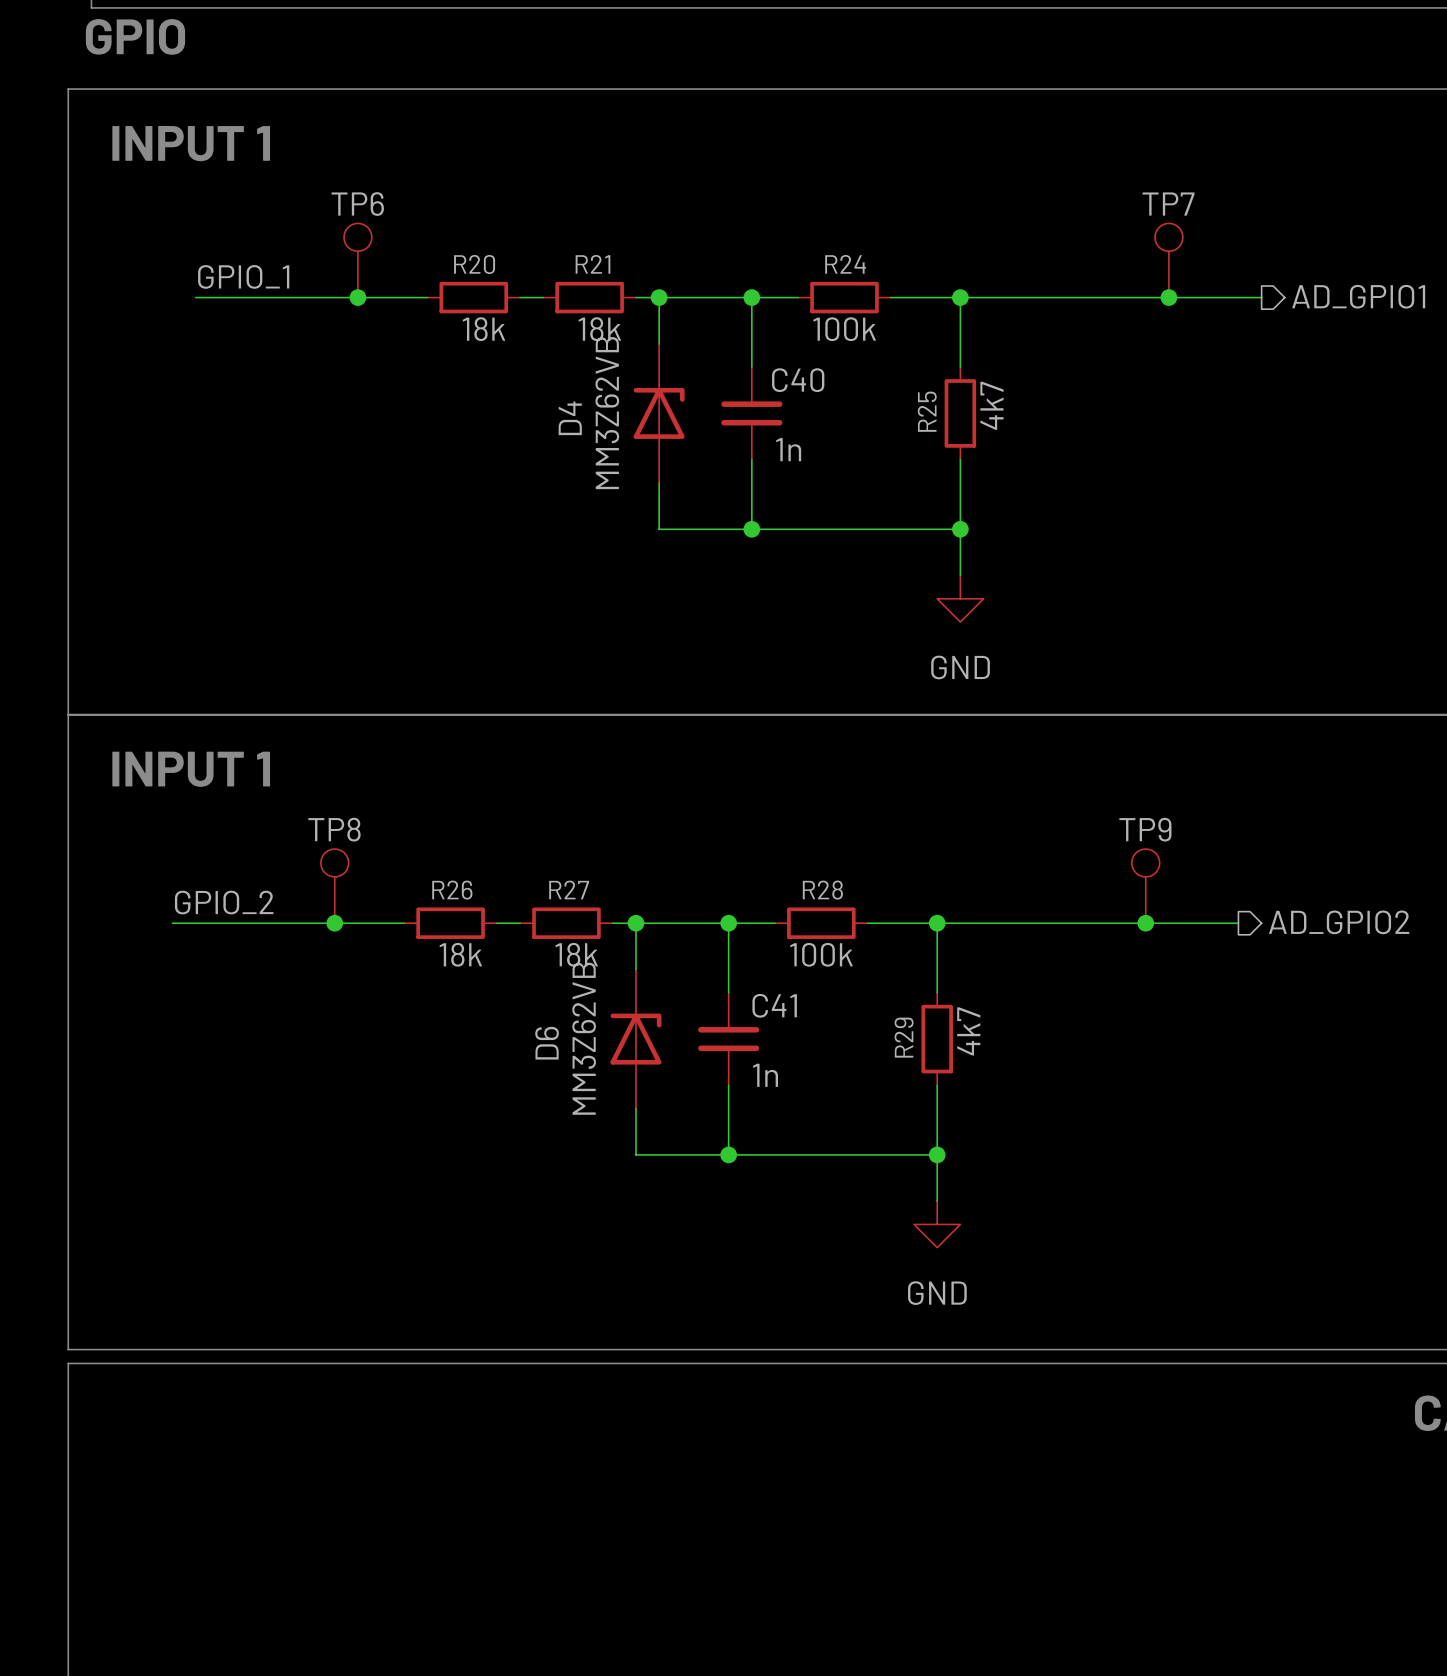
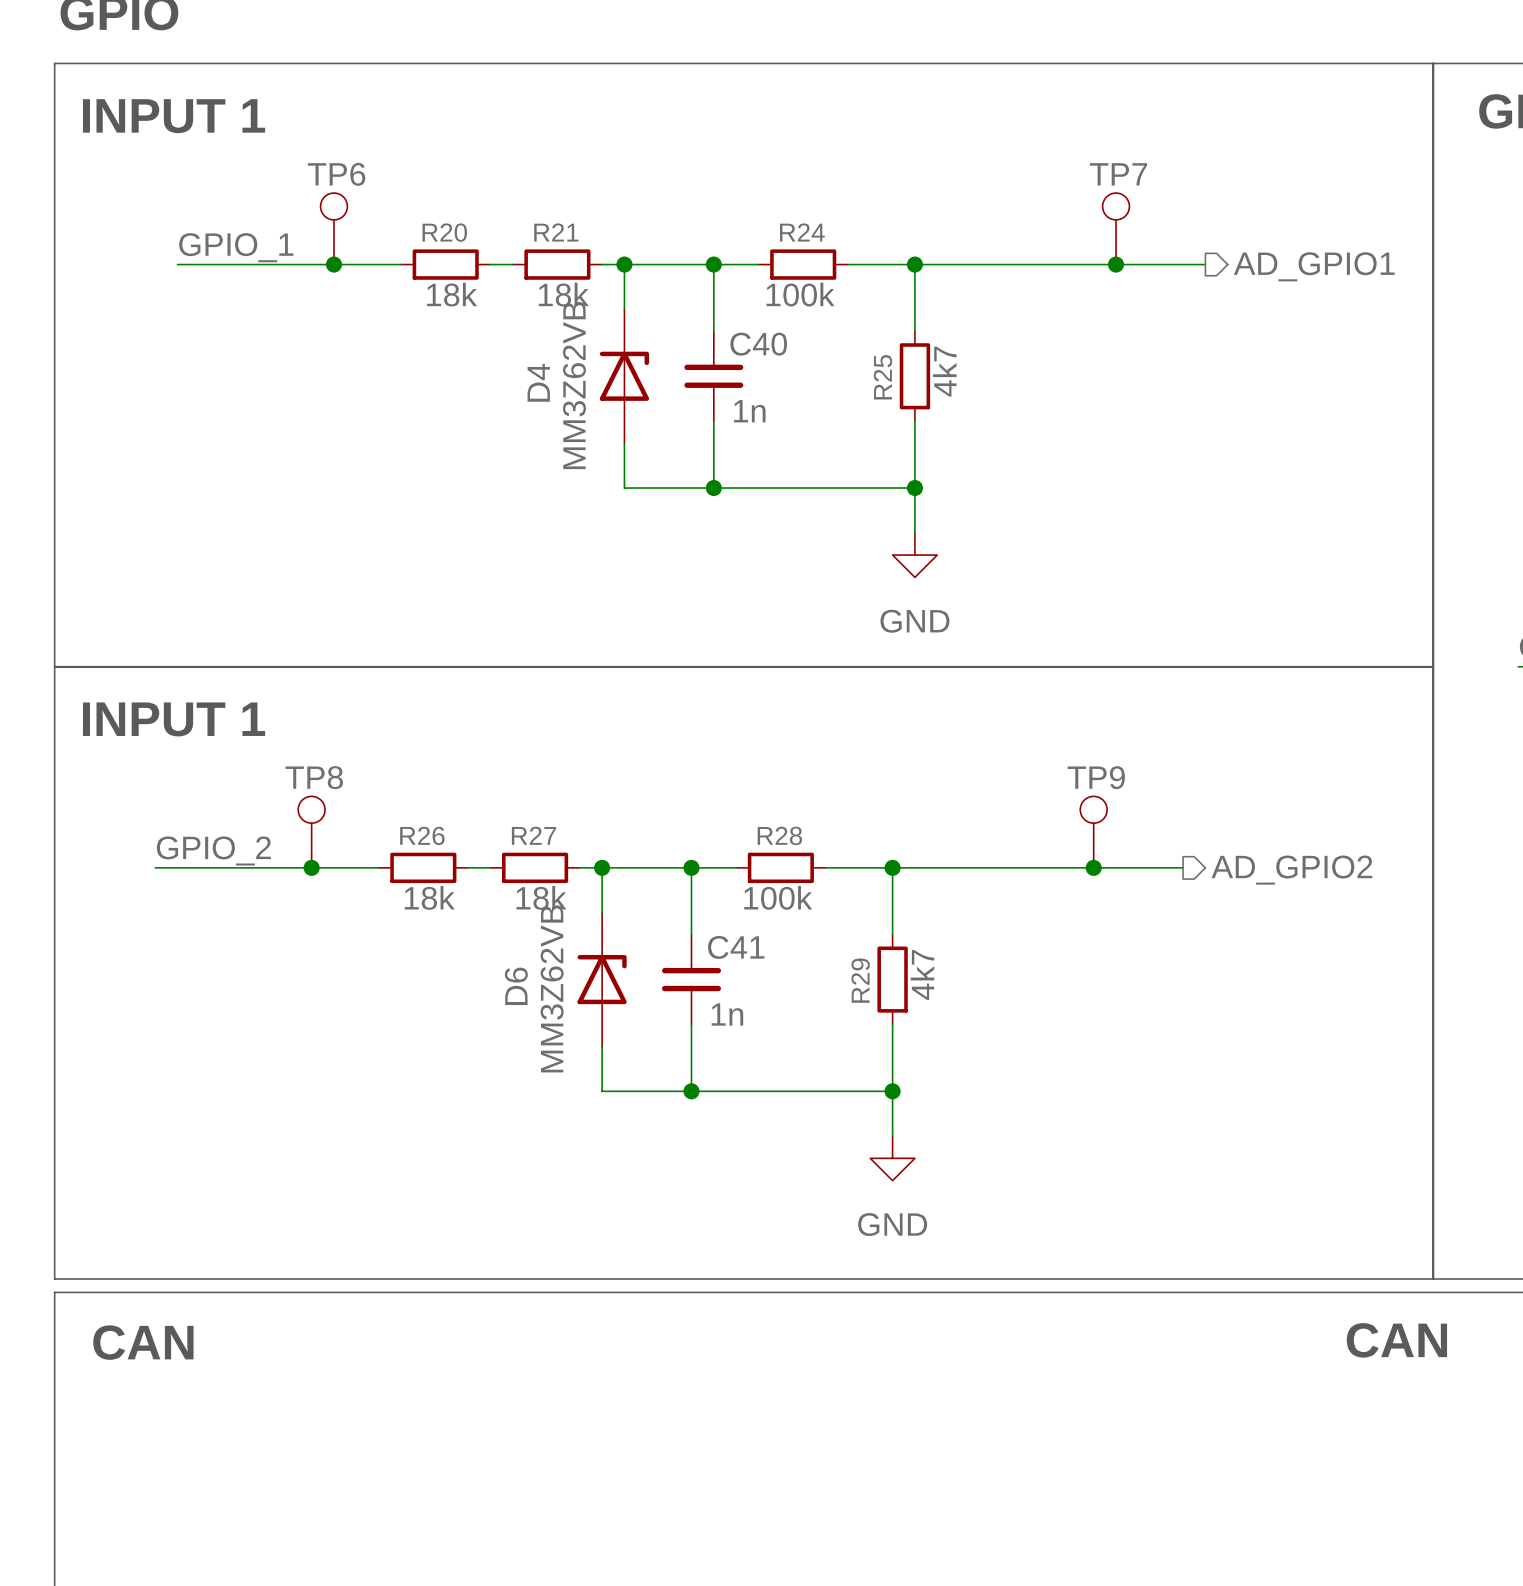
text: none -> CAN (143, 1342)

